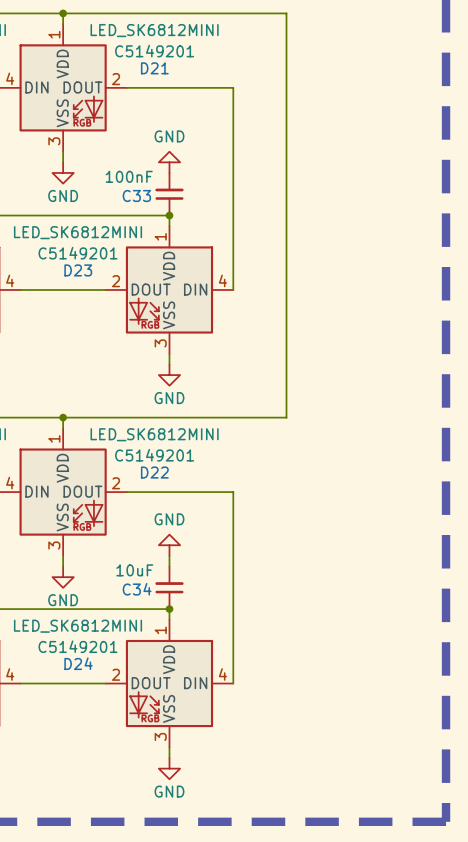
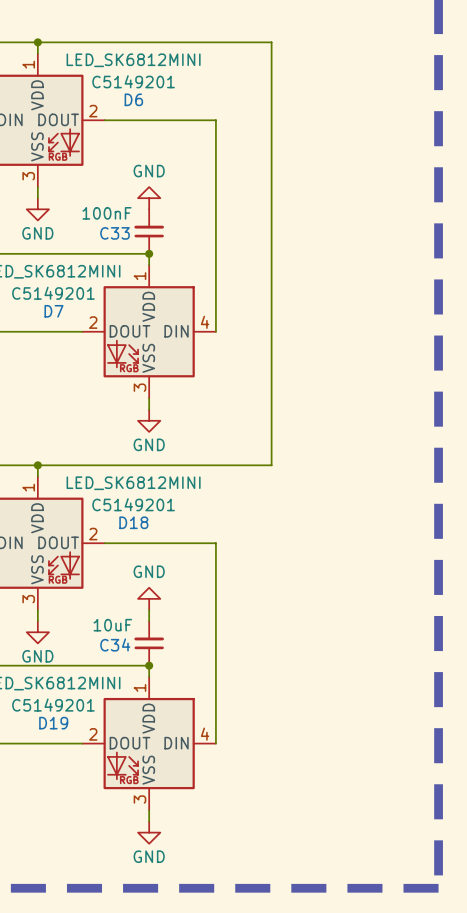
D21 name: D21 (154, 68) -> D6 (133, 99)
D23 name: D23 (78, 270) -> D7 (53, 311)
D22 name: D22 (154, 472) -> D18 (133, 522)
D24 name: D24 (78, 663) -> D19 (53, 723)

